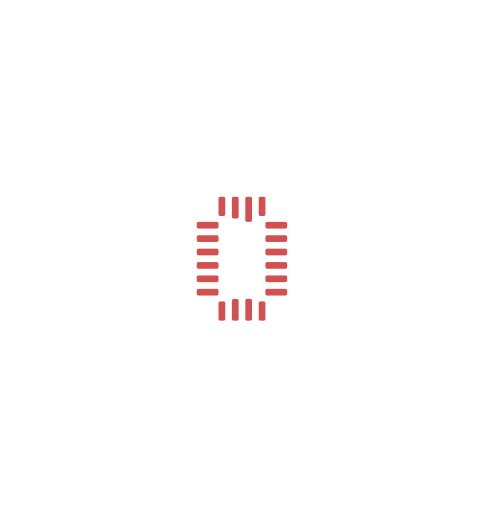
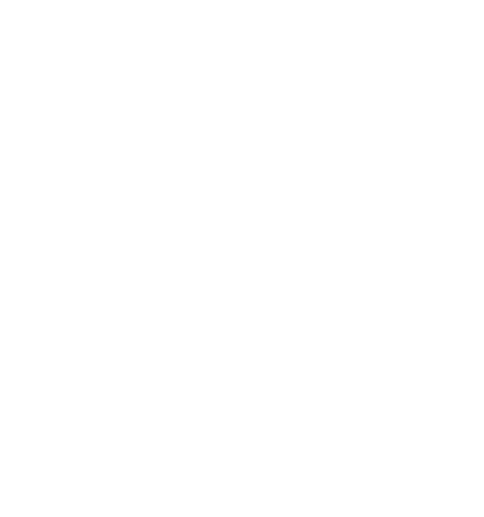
part: (241, 258) -> none

